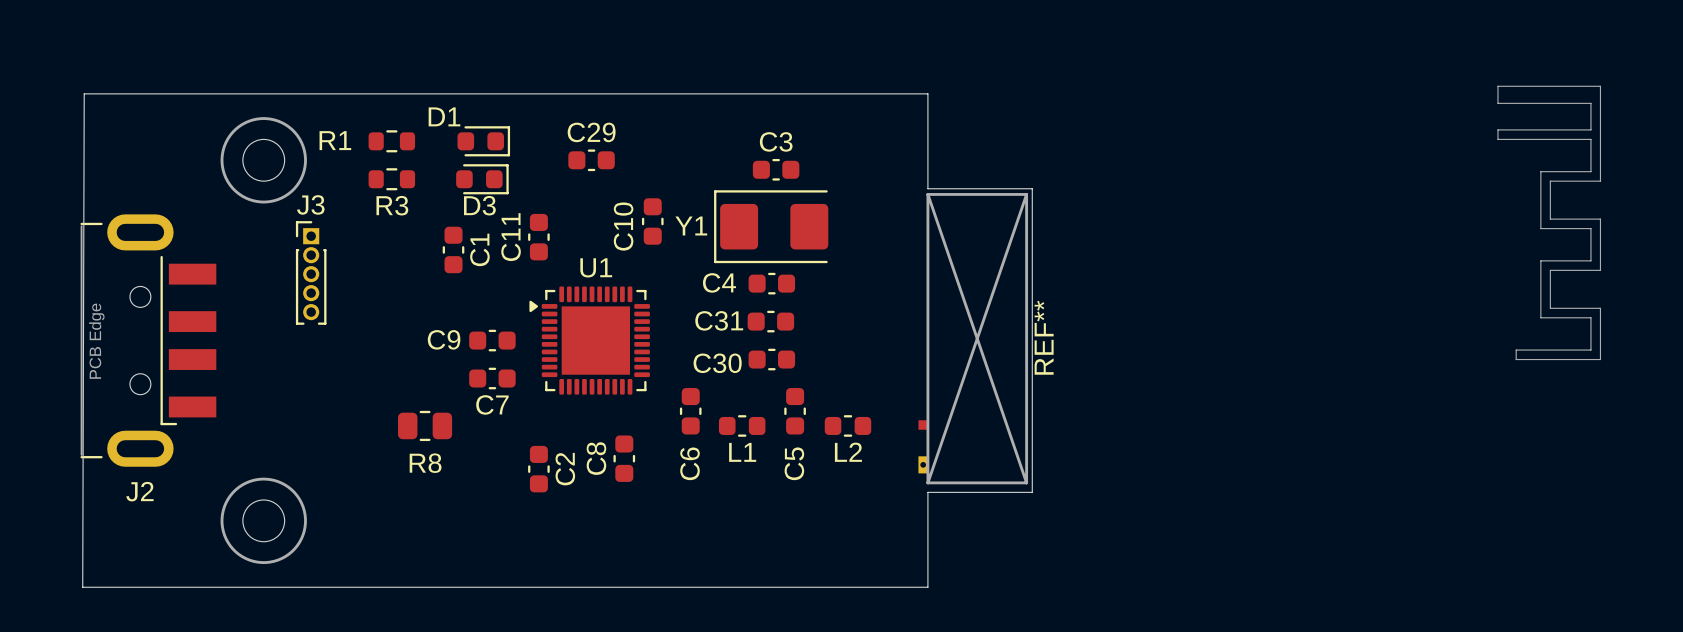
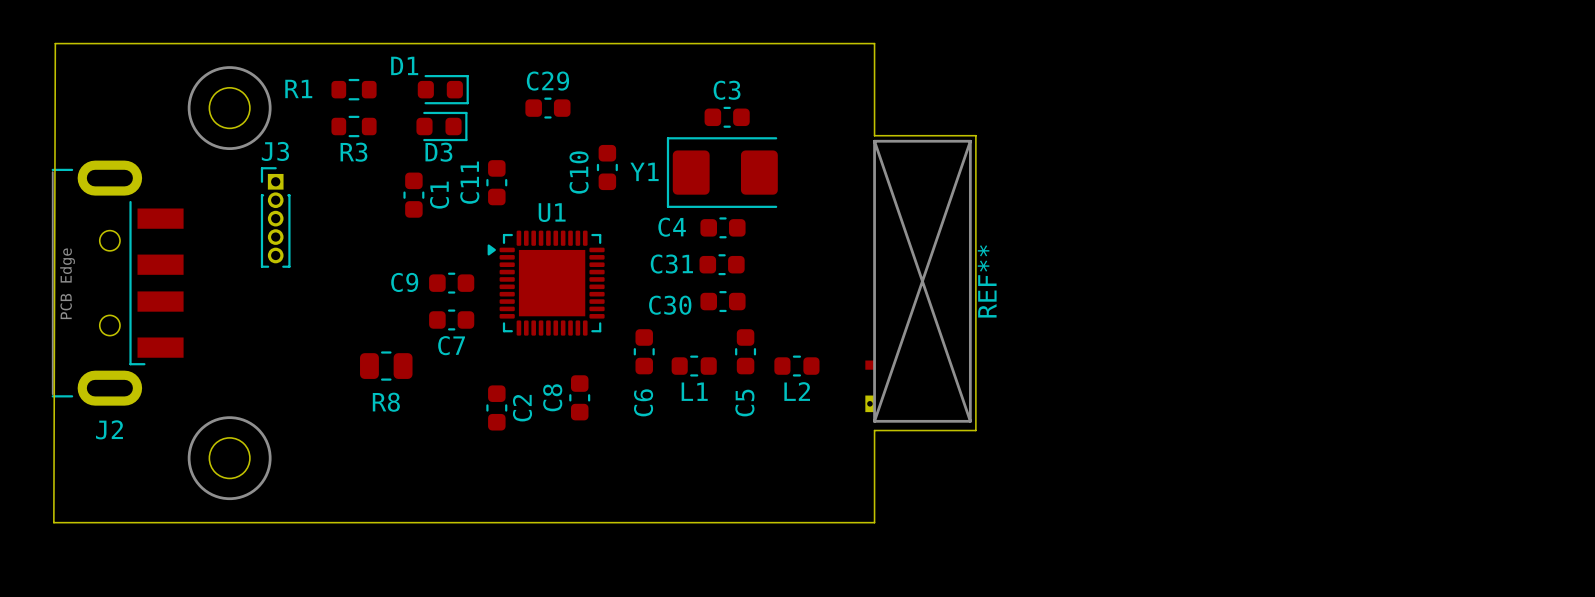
line: (1497, 86) (1497, 103) (1590, 103) (1590, 129) (1497, 129) (1497, 139) (1590, 139) (1590, 171) (1540, 171) (1540, 228) (1590, 228) (1590, 260) (1540, 260) (1540, 317) (1590, 317) (1590, 350) (1516, 350) (1516, 359) (1600, 359) (1600, 308) (1550, 308) (1550, 270) (1600, 270) (1600, 219) (1550, 219) (1550, 181) (1600, 181) (1600, 86) (1497, 86) -> none

